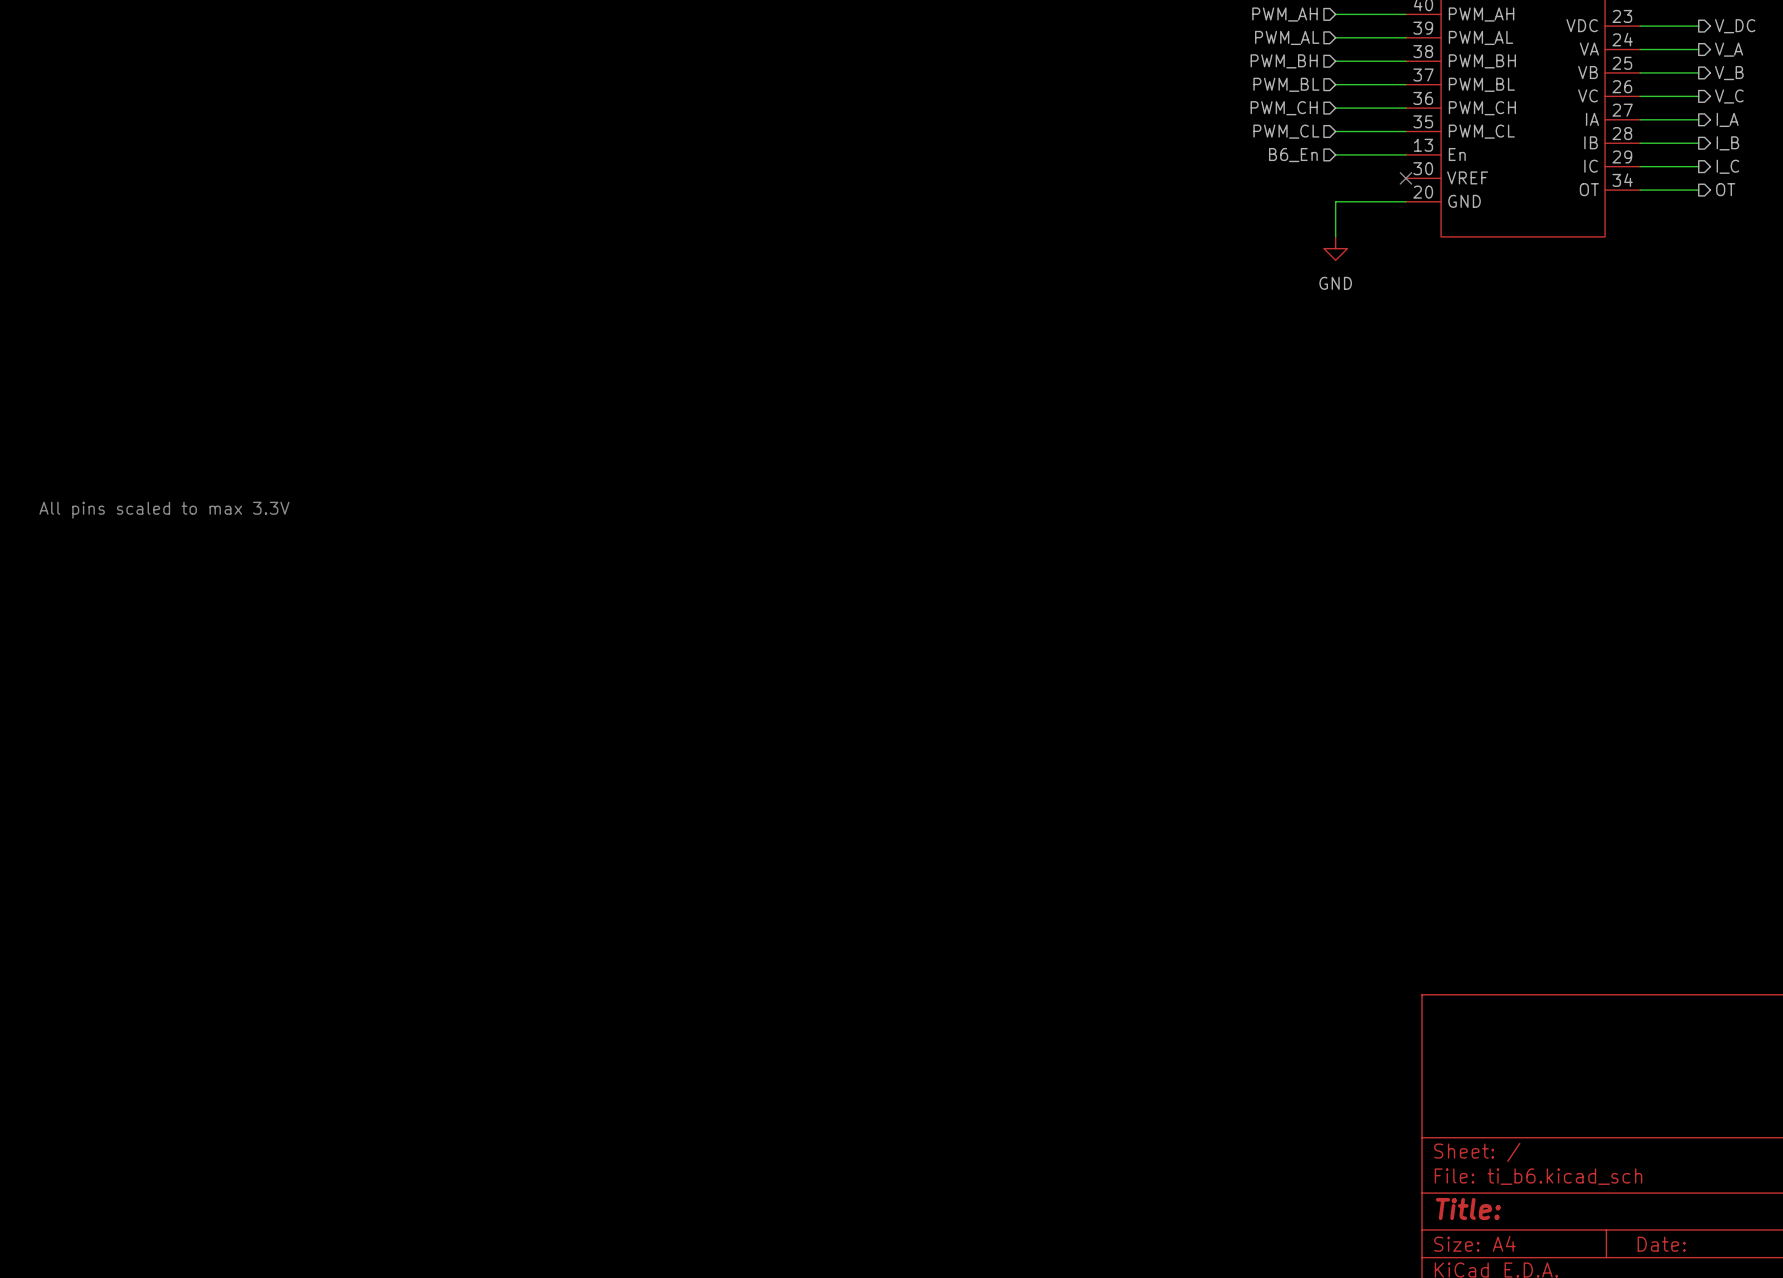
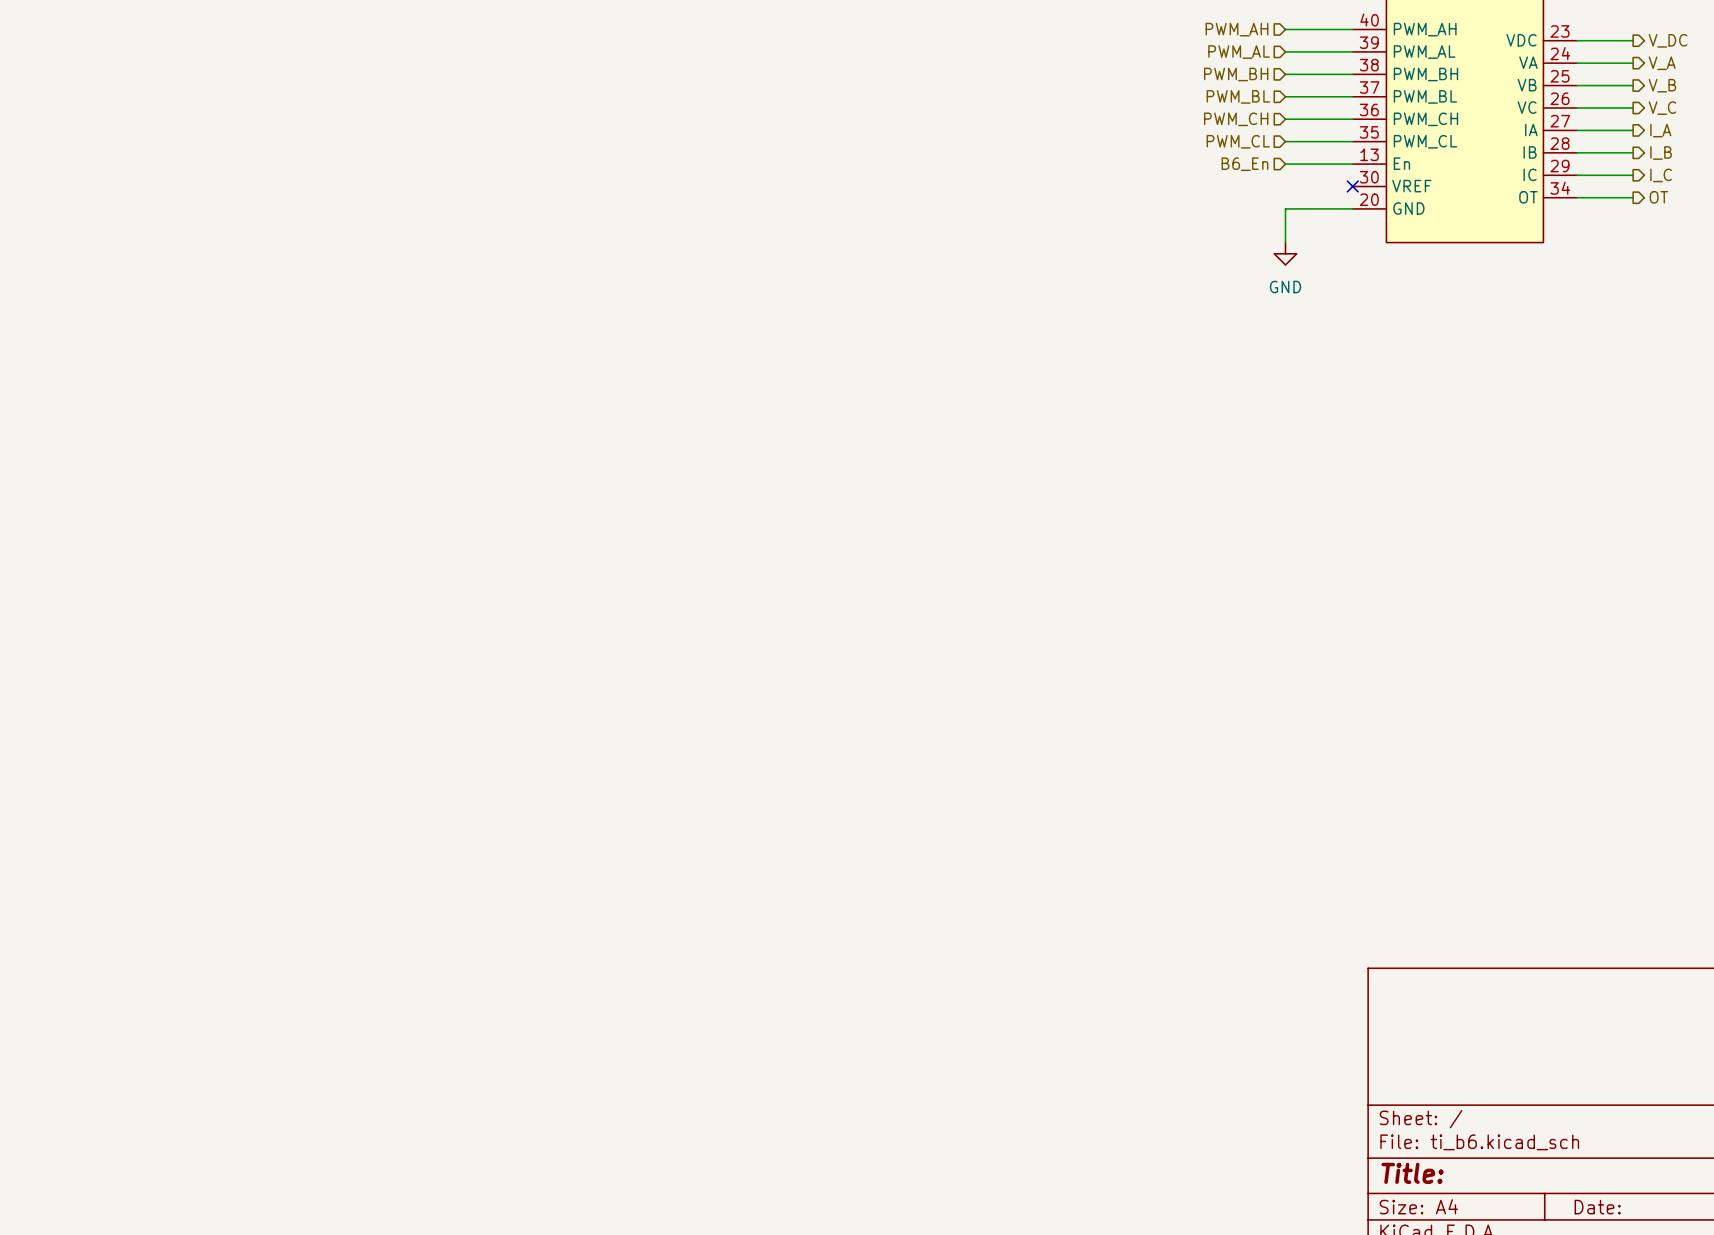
text: All pins scaled to max 3.3V (164, 510) -> none

